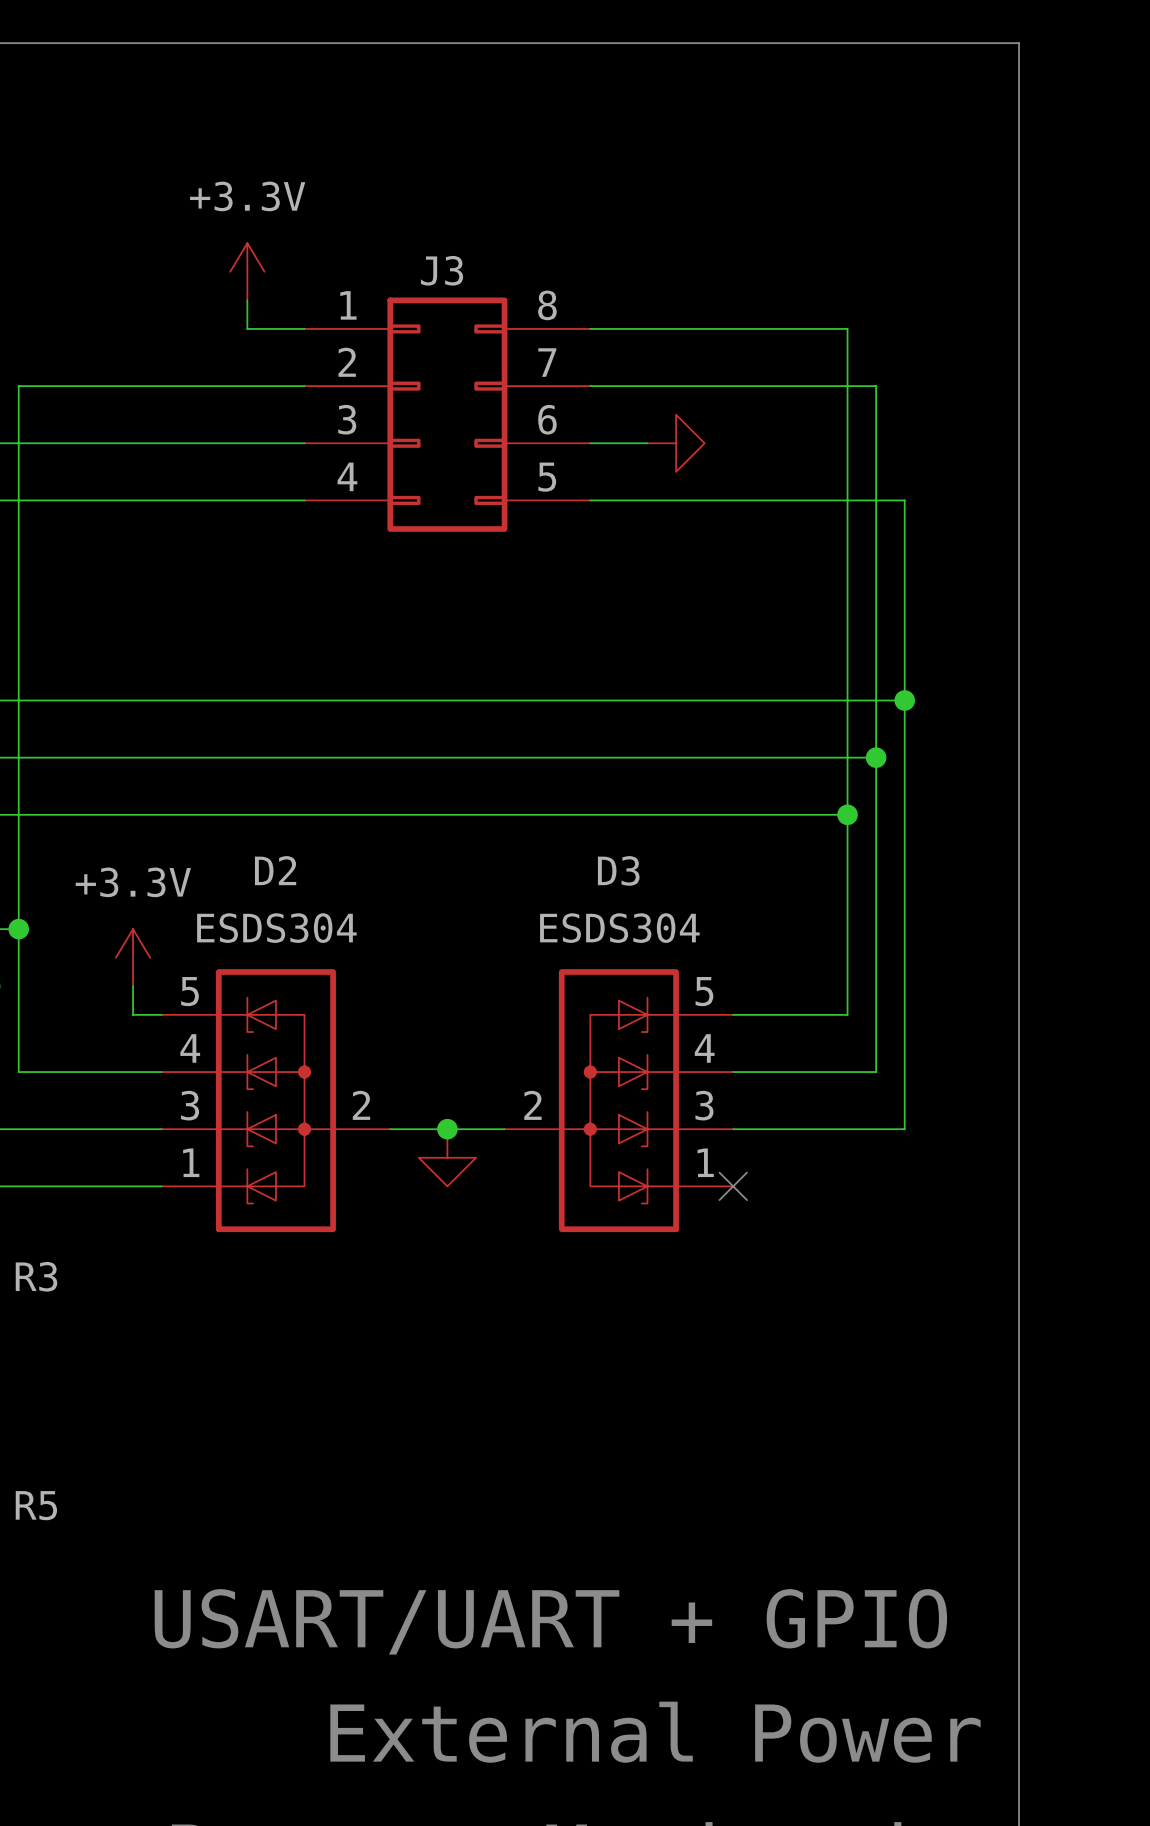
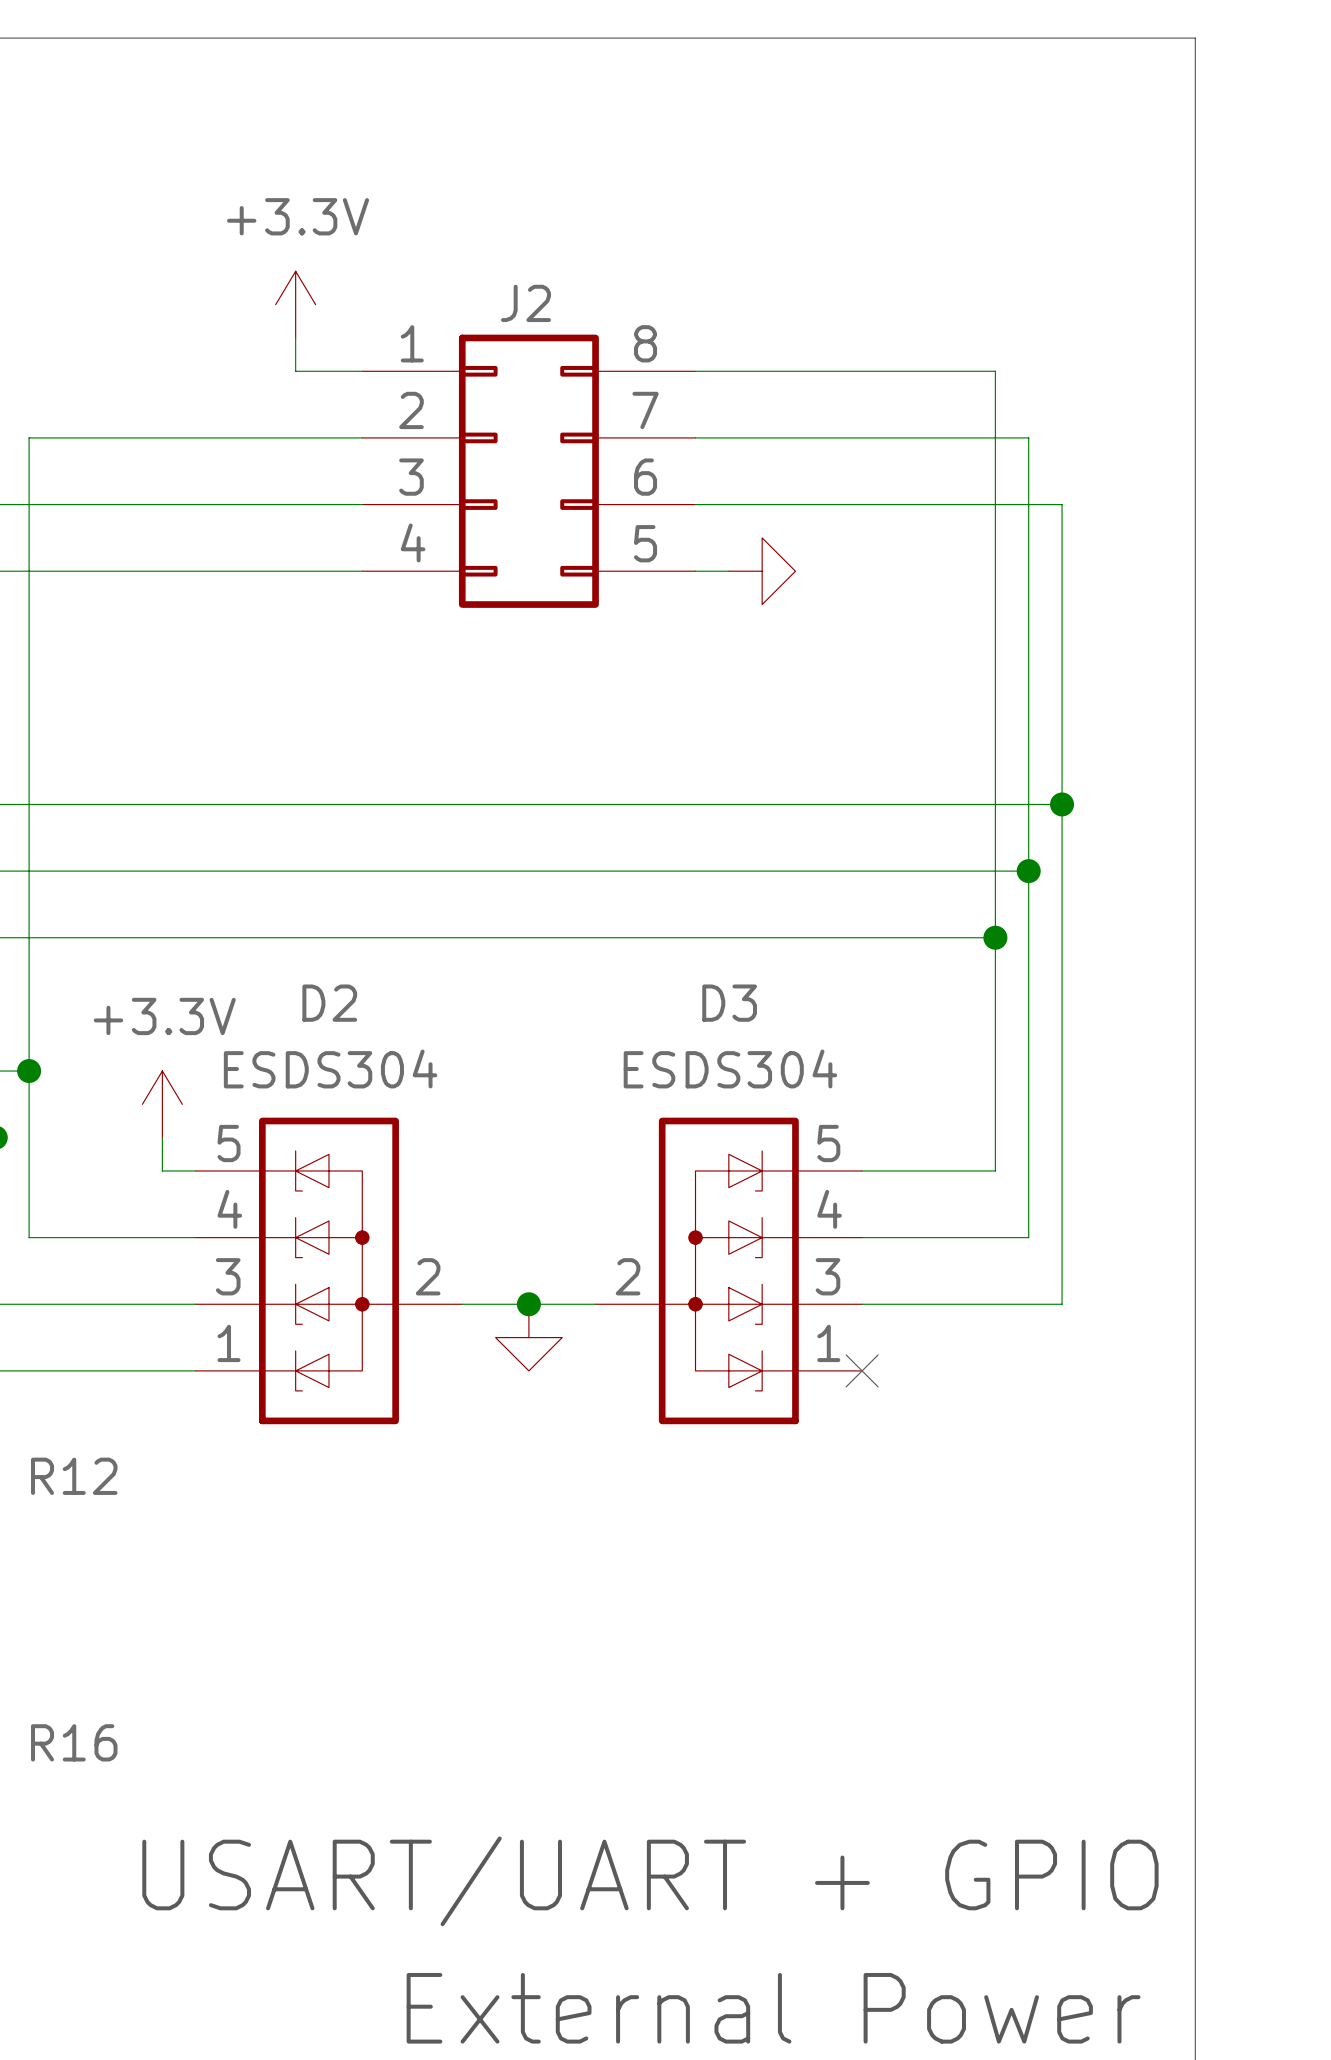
J3 name: J3 (442, 270) -> J2 (525, 303)
power symbol position: (676, 443) -> (762, 571)
wire: (618, 500) (904, 500) -> (762, 504) (1062, 504) (1062, 571)
R3 name: R3 (36, 1276) -> R12 (74, 1476)
R5 name: R5 (36, 1505) -> R16 (74, 1742)

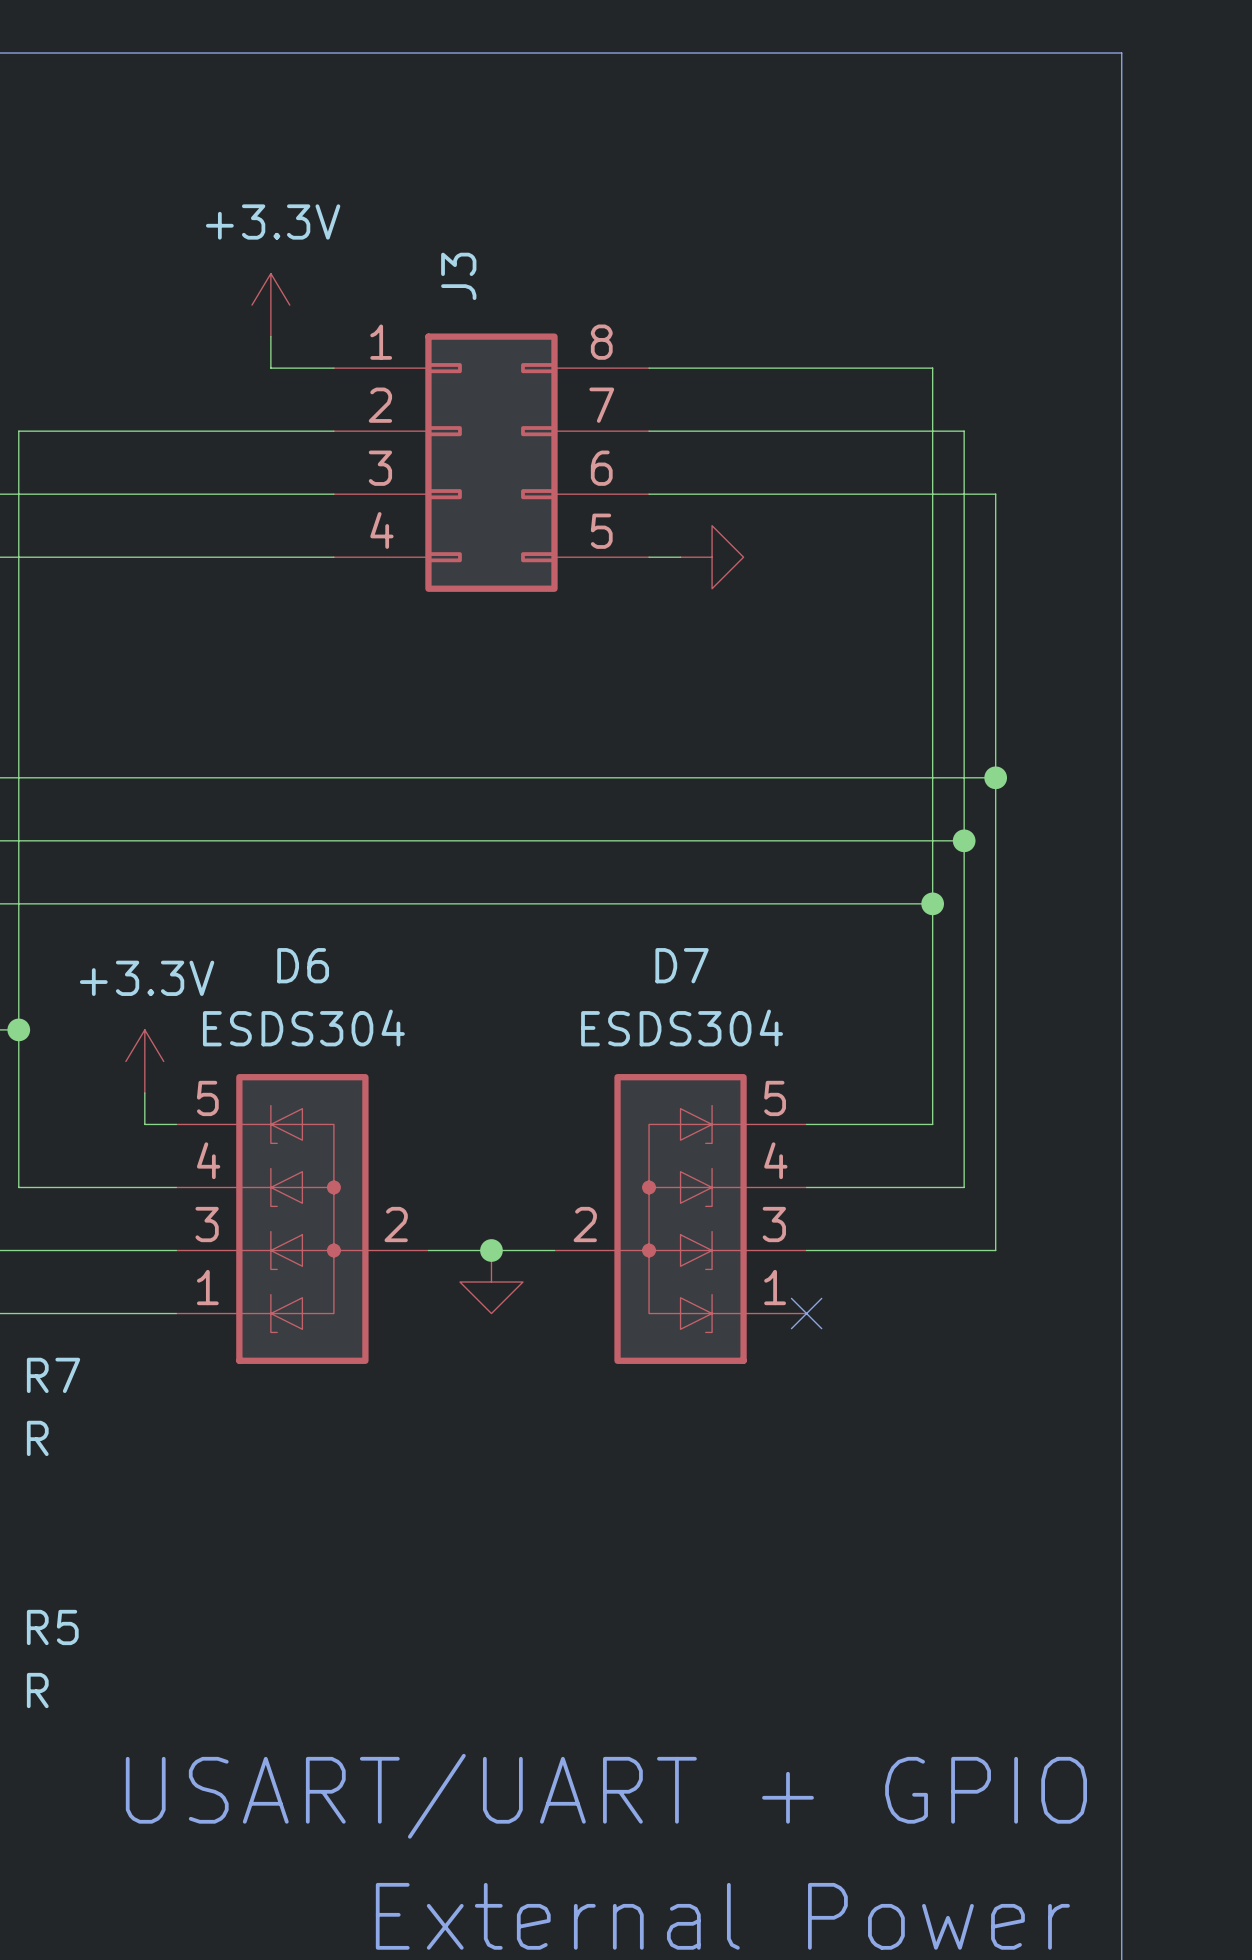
J2 name: J2 (525, 303) -> J3 (458, 276)
D2 name: D2 (329, 1003) -> D6 (303, 965)
D3 name: D3 (729, 1003) -> D7 (682, 965)
R12 name: R12 (74, 1476) -> R7 (53, 1375)
R12 value: none -> R (37, 1438)
R16 name: R16 (74, 1742) -> R5 (52, 1627)
R16 value: none -> R (37, 1690)

